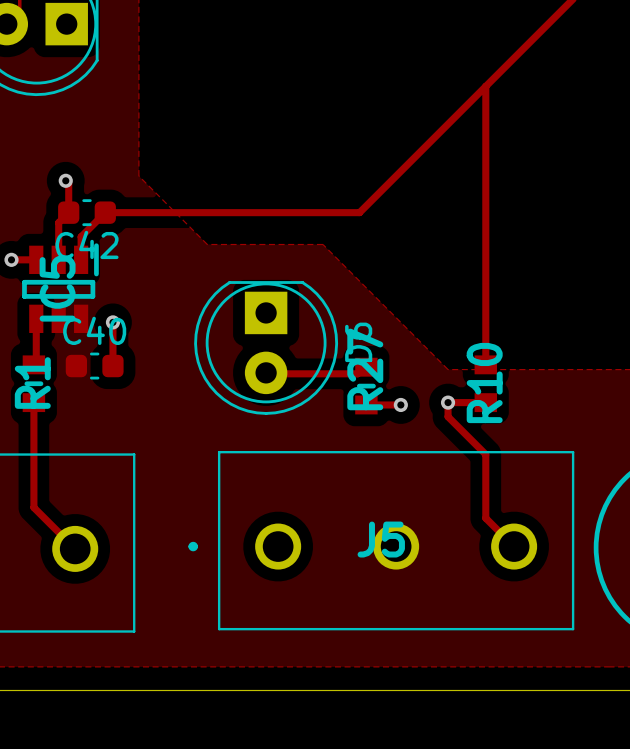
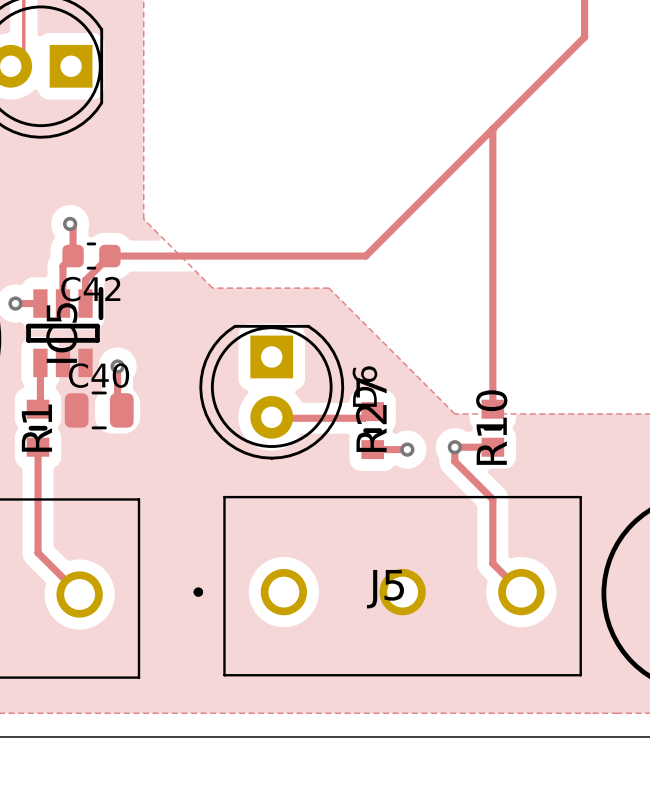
C40 footprint: [65, 352, 124, 380] -> [64, 391, 134, 430]

